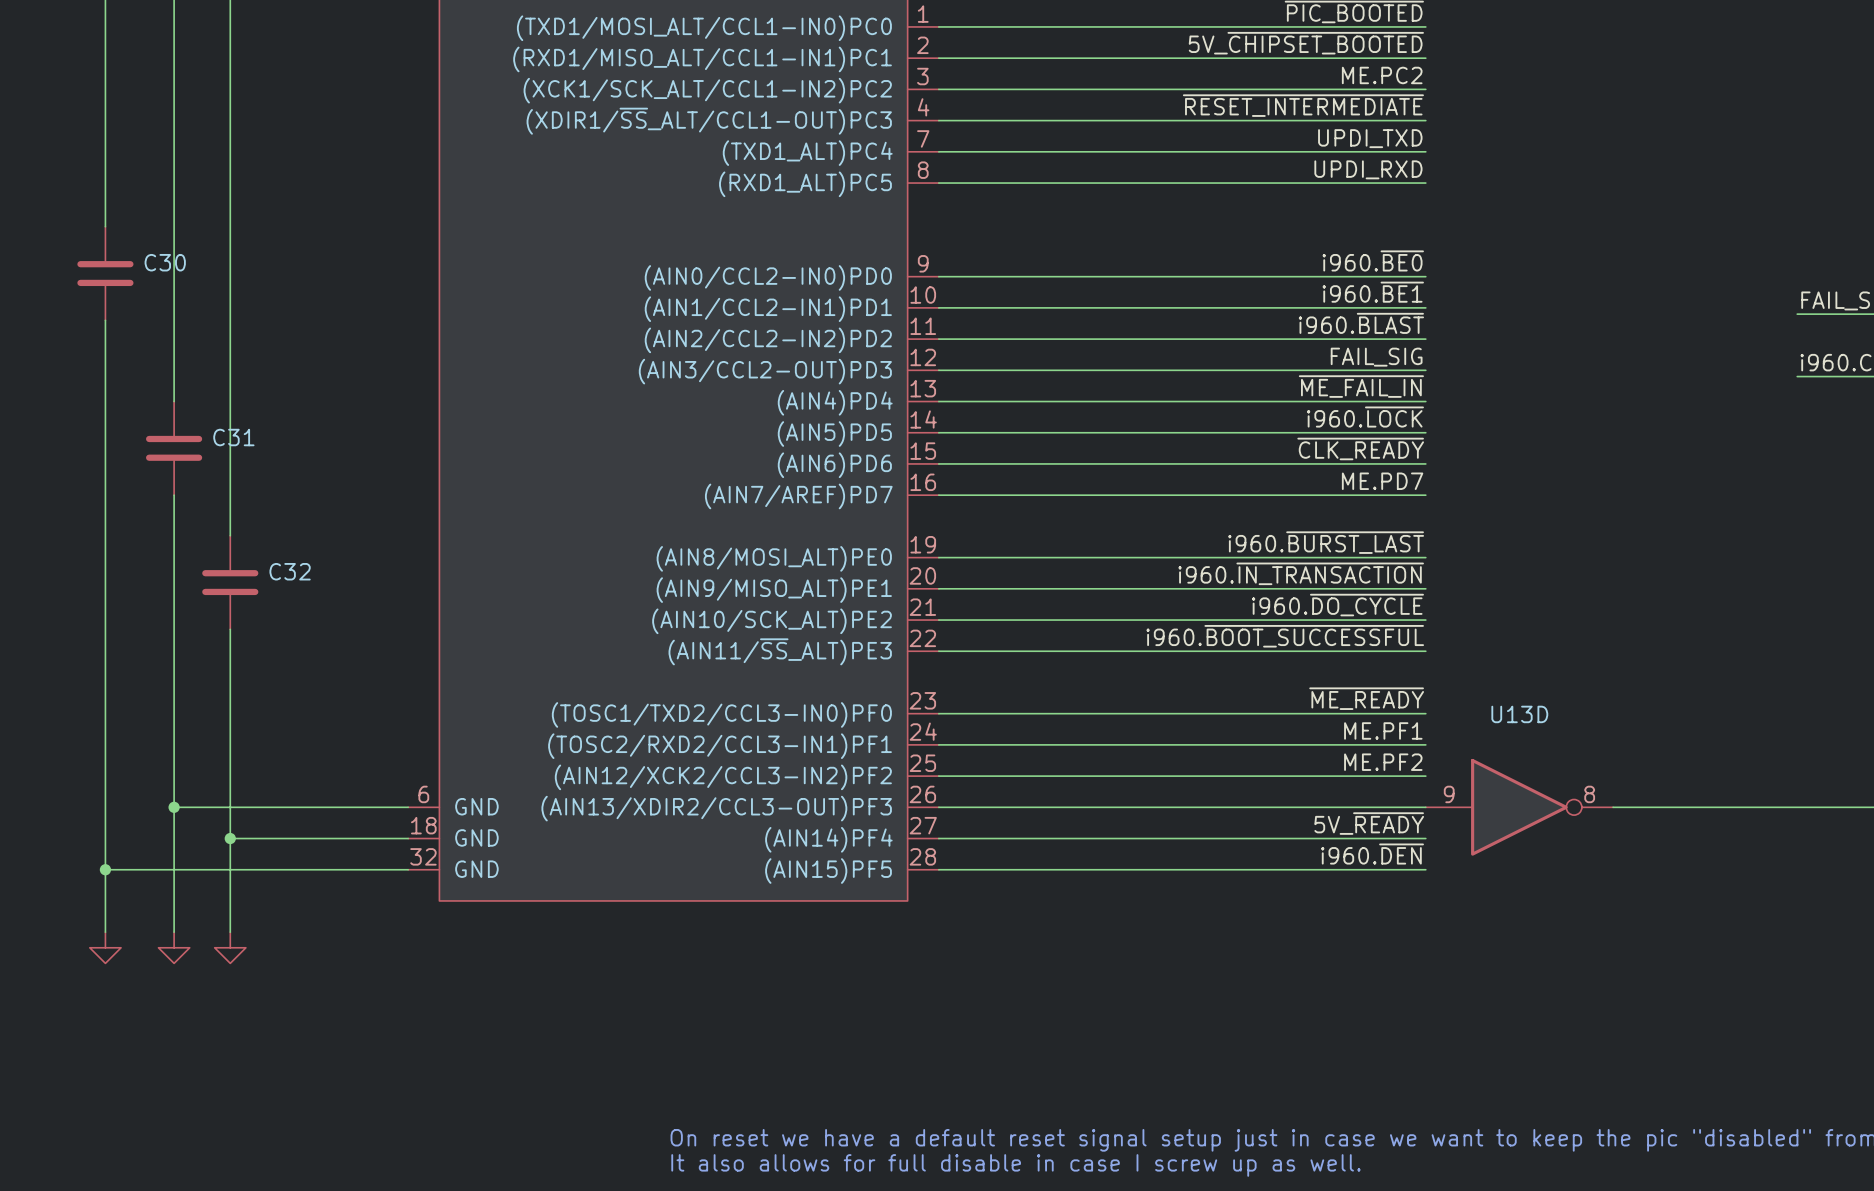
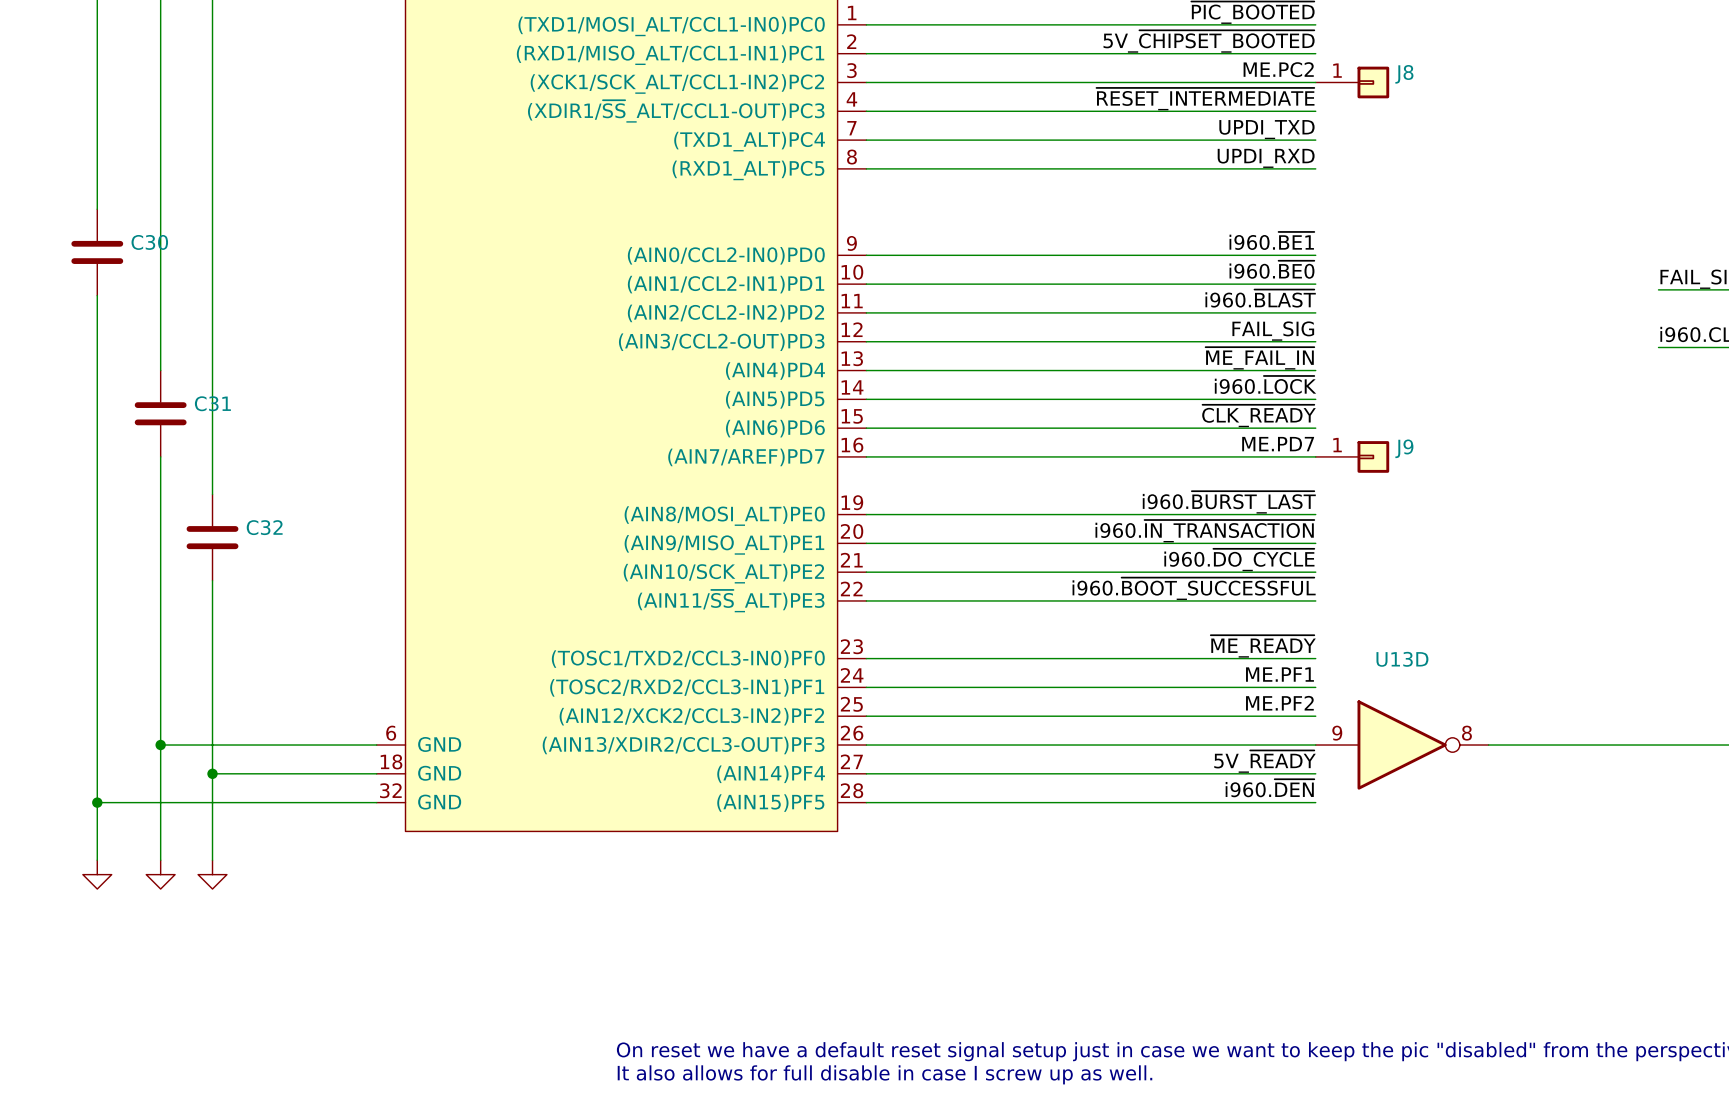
J8: none -> (1352, 82)
label: i960.~{BE0} (1373, 260) -> i960.~{BE1} (1271, 240)
label: i960.~{BE1} (1373, 292) -> i960.~{BE0} (1271, 269)
J9: none -> (1352, 456)

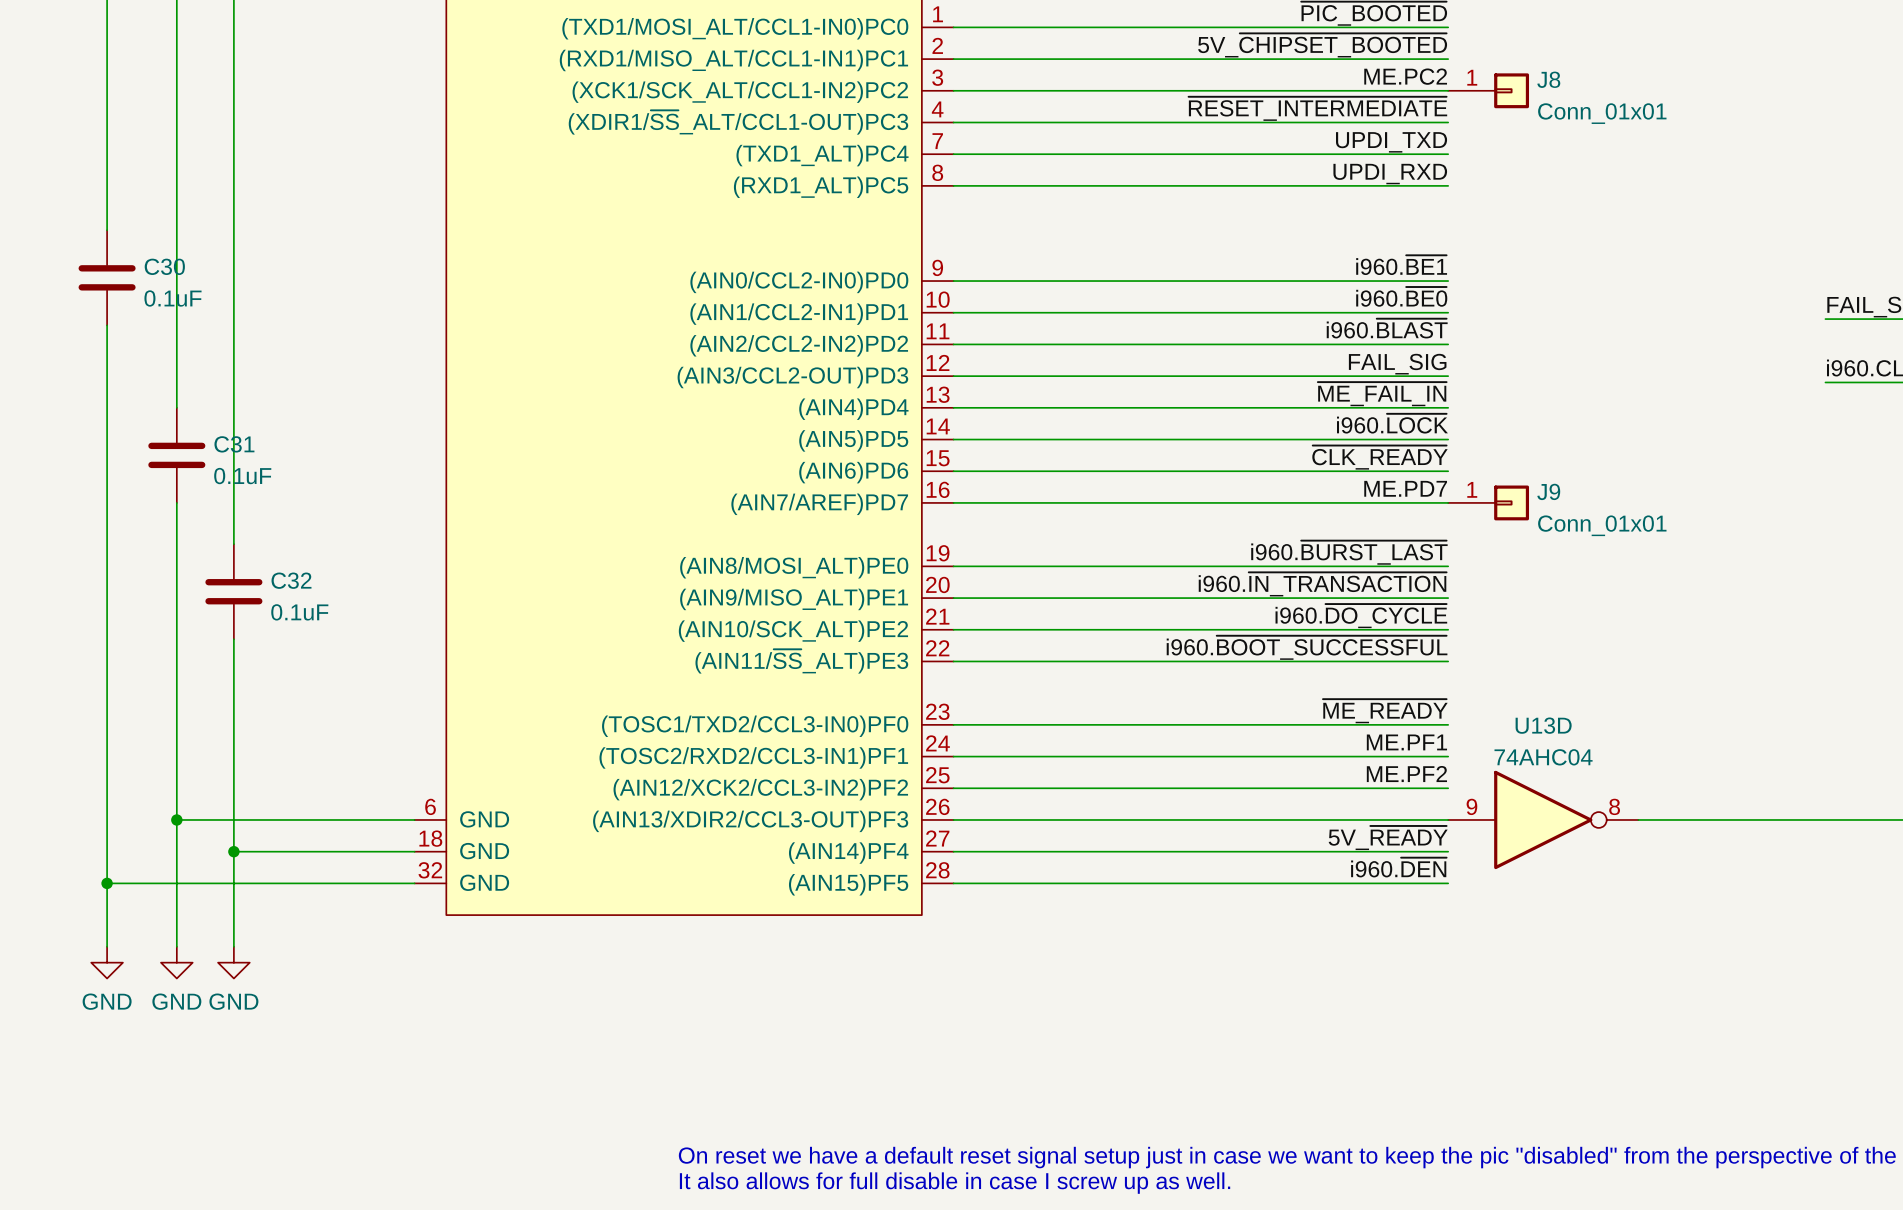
J8 value: none -> Conn_01x01 (1602, 113)
C30 value: none -> 0.1uF (172, 298)
C31 value: none -> 0.1uF (242, 476)
J9 value: none -> Conn_01x01 (1602, 525)
C32 value: none -> 0.1uF (299, 612)
U13D value: none -> 74AHC04 (1543, 757)
power symbol text: none -> GND (107, 1001)
power symbol text: none -> GND (176, 1001)
power symbol text: none -> GND (233, 1001)

